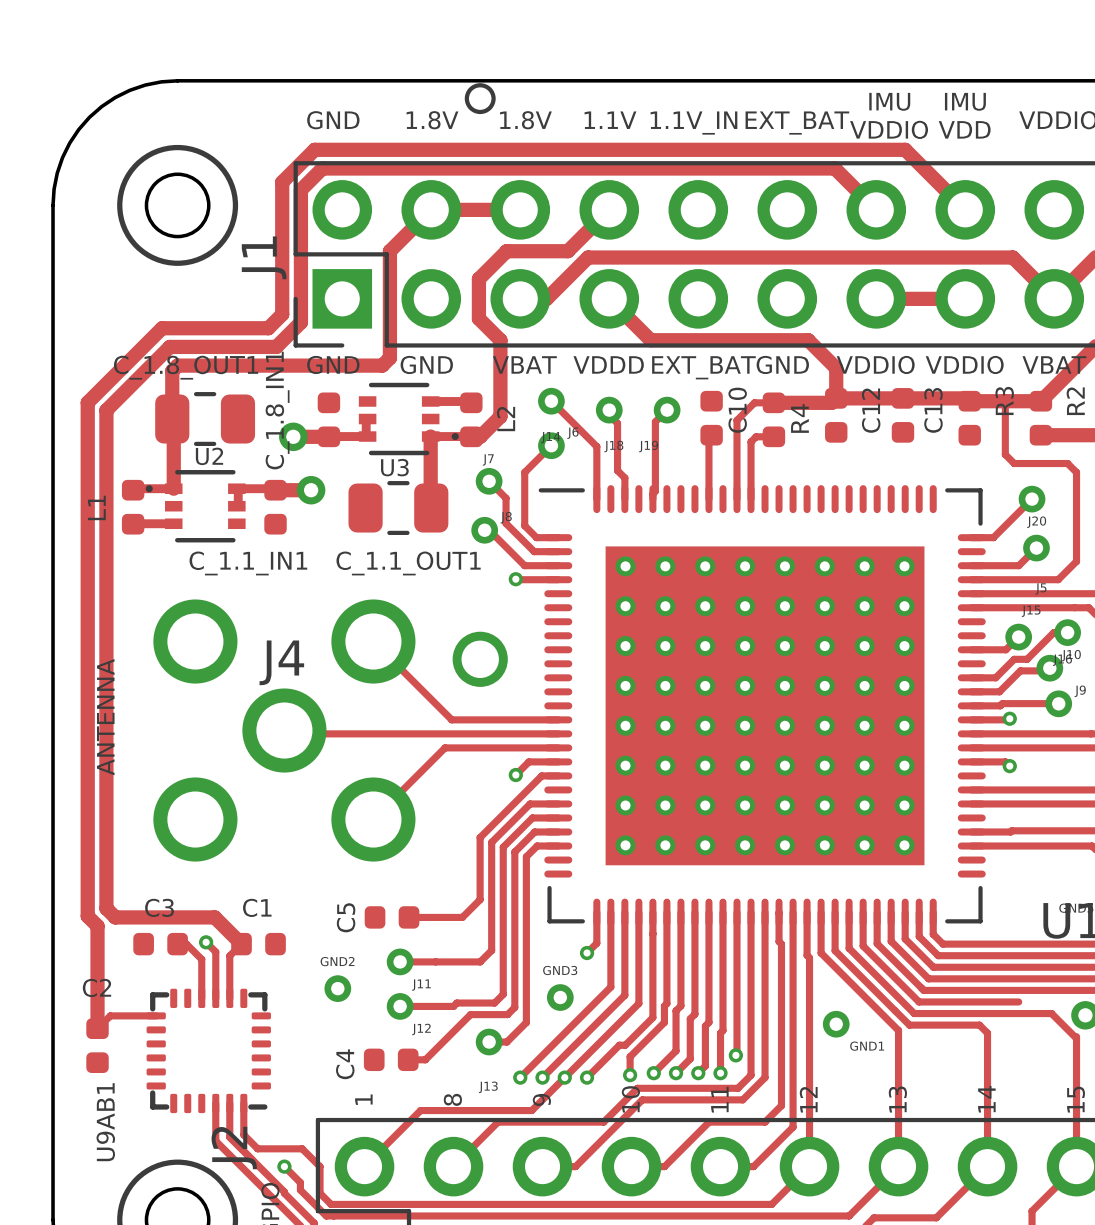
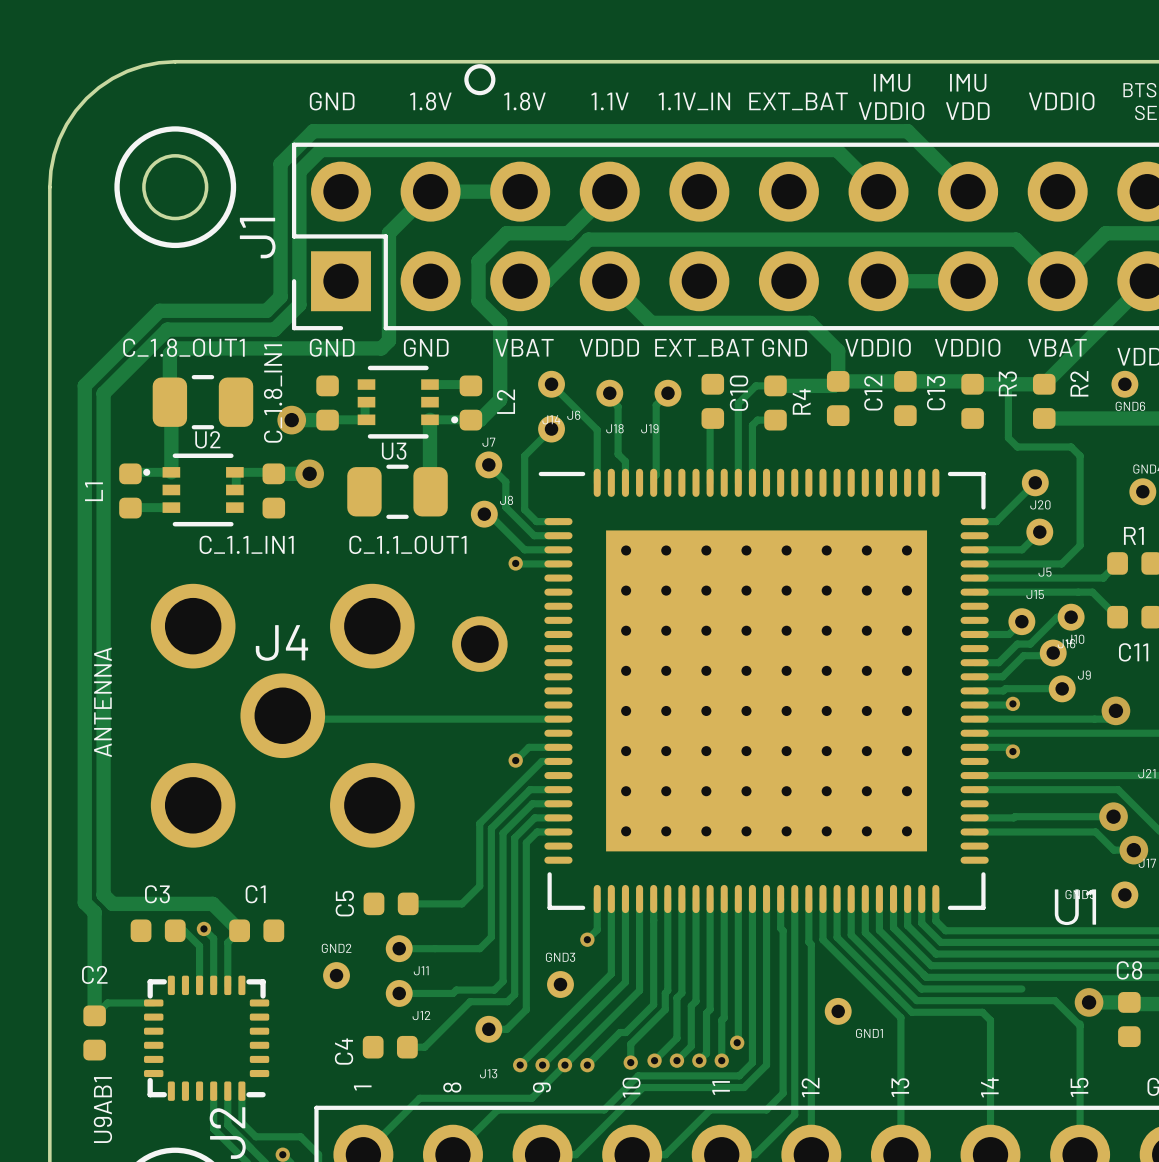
track: (373, 641) (451, 719) (558, 719) -> none
track: (558, 747) (445, 747) (373, 819) -> none

